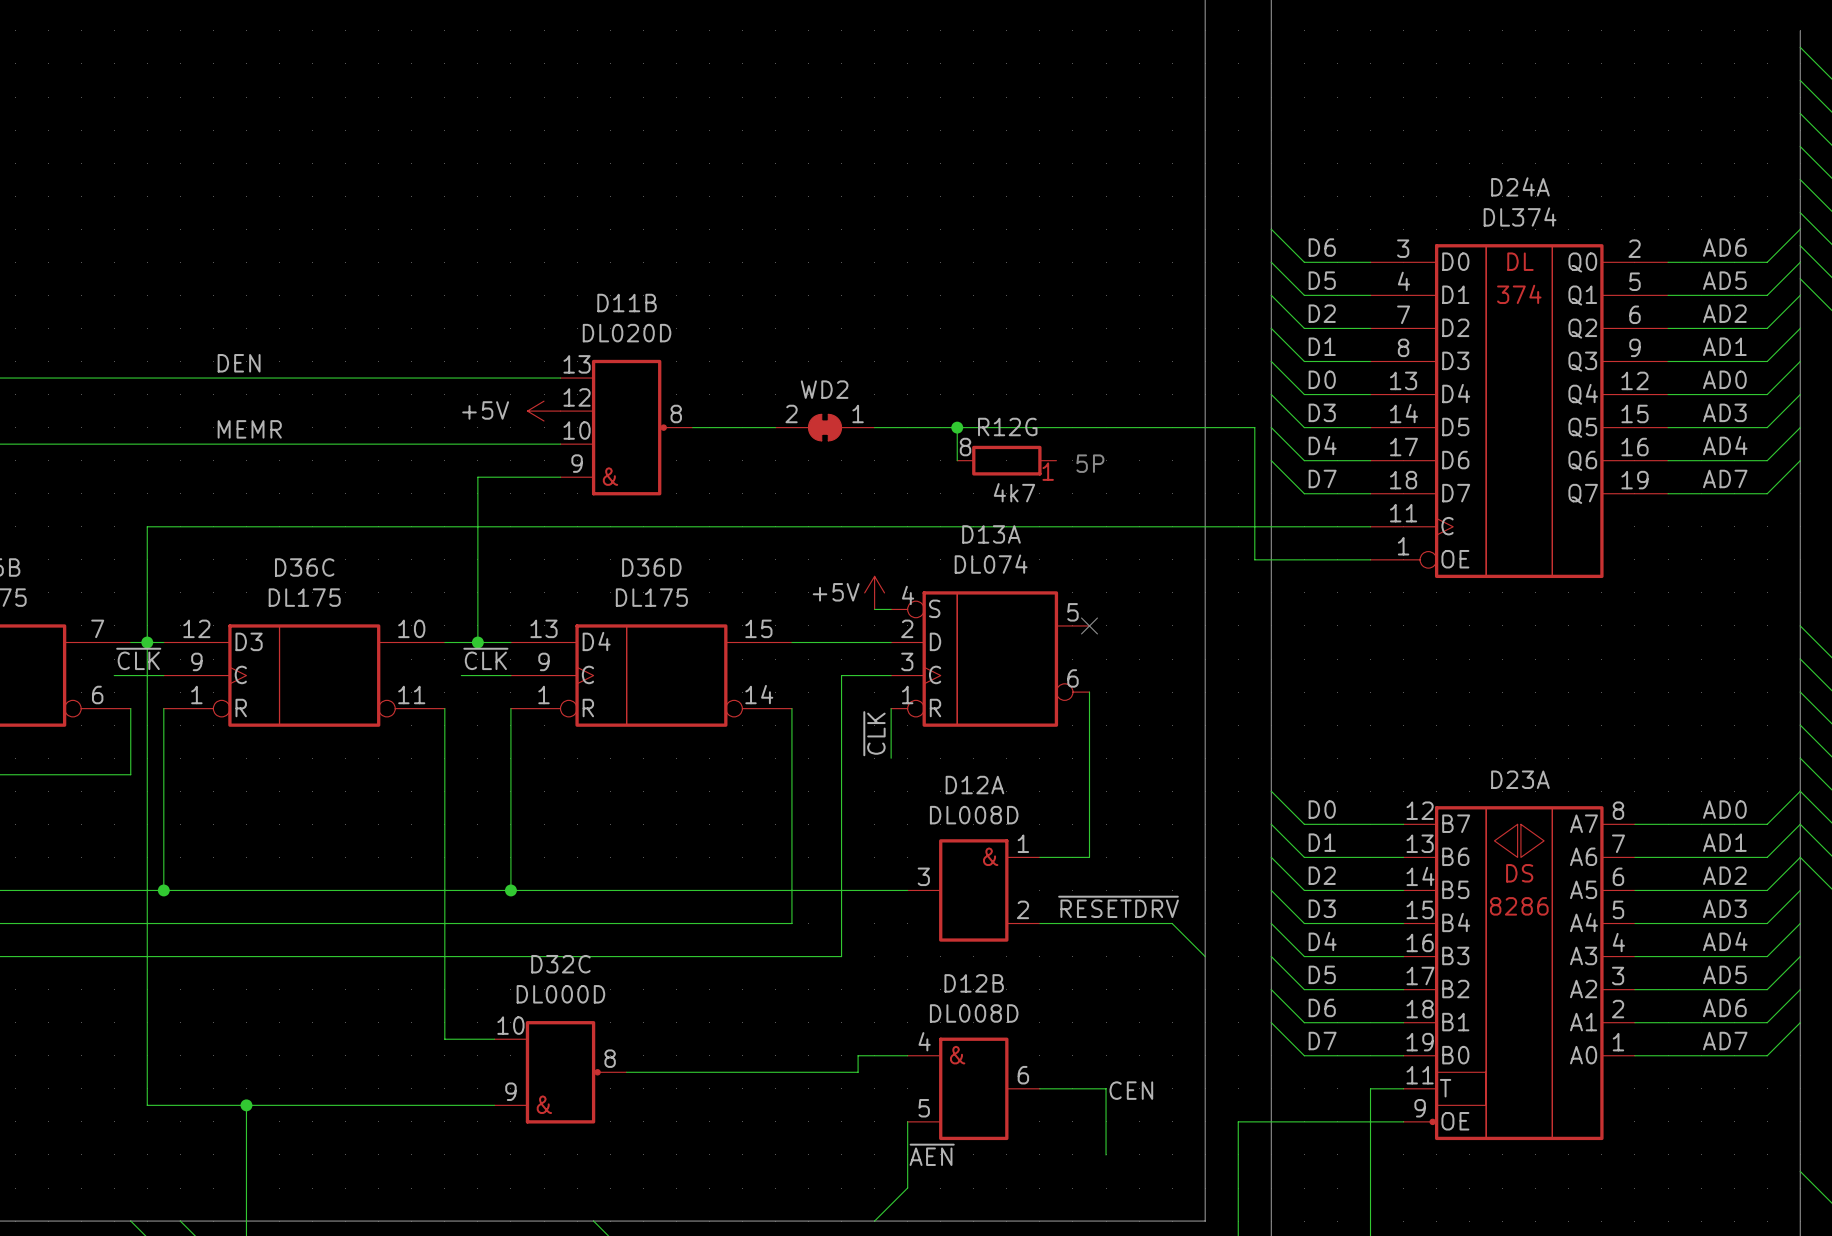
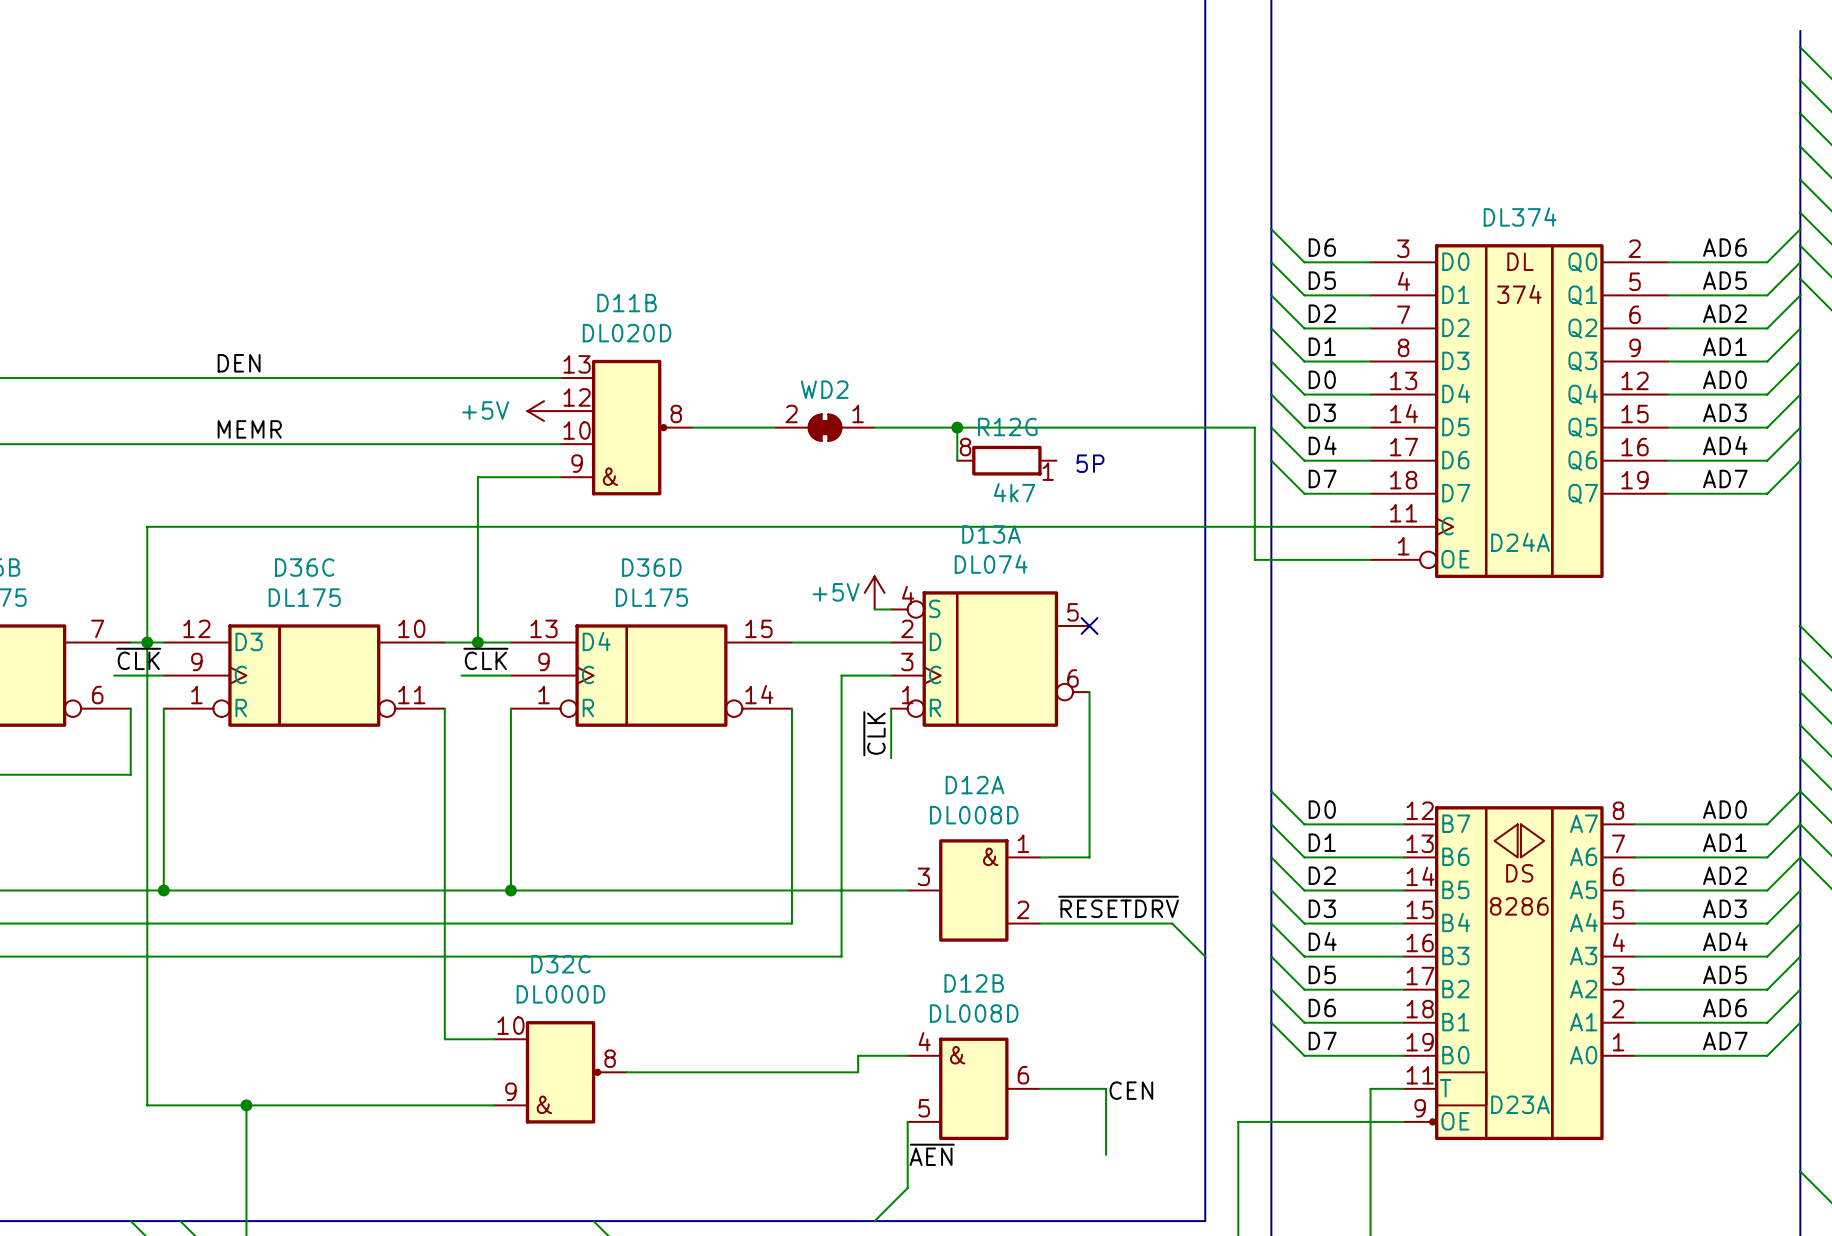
D24A name position: D24A (1520, 186) -> D24A (1520, 542)
D23A name position: D23A (1520, 779) -> D23A (1520, 1104)

